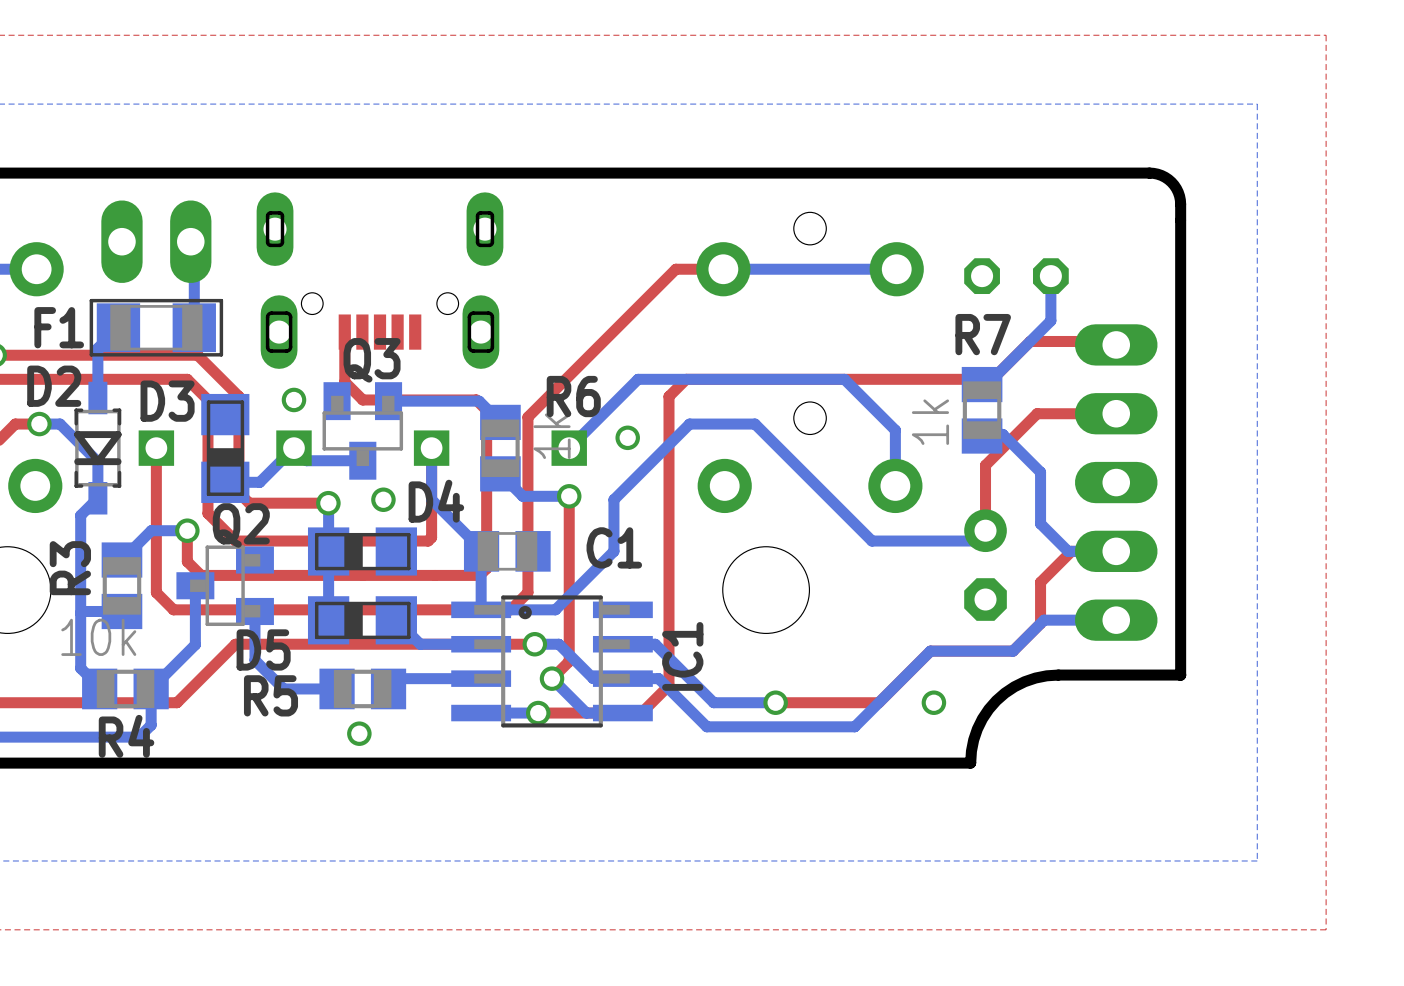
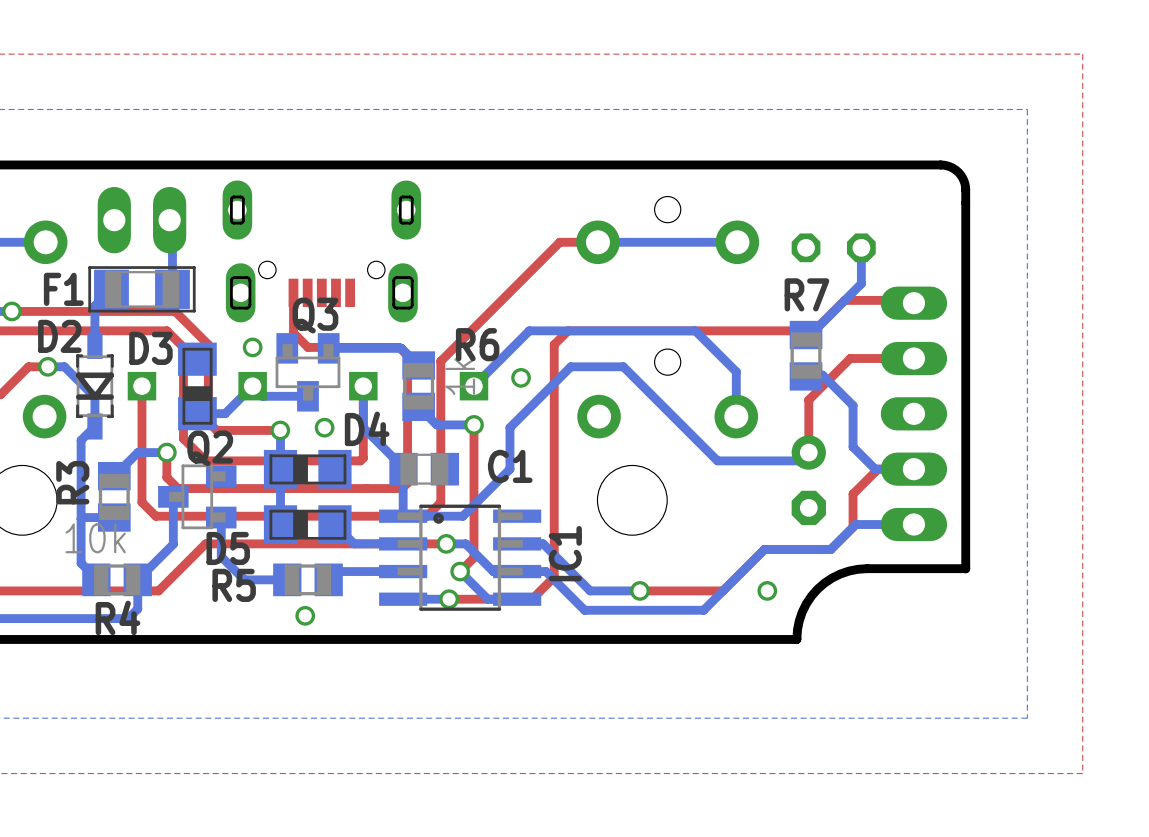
R7 value: 1k (930, 422) -> none

